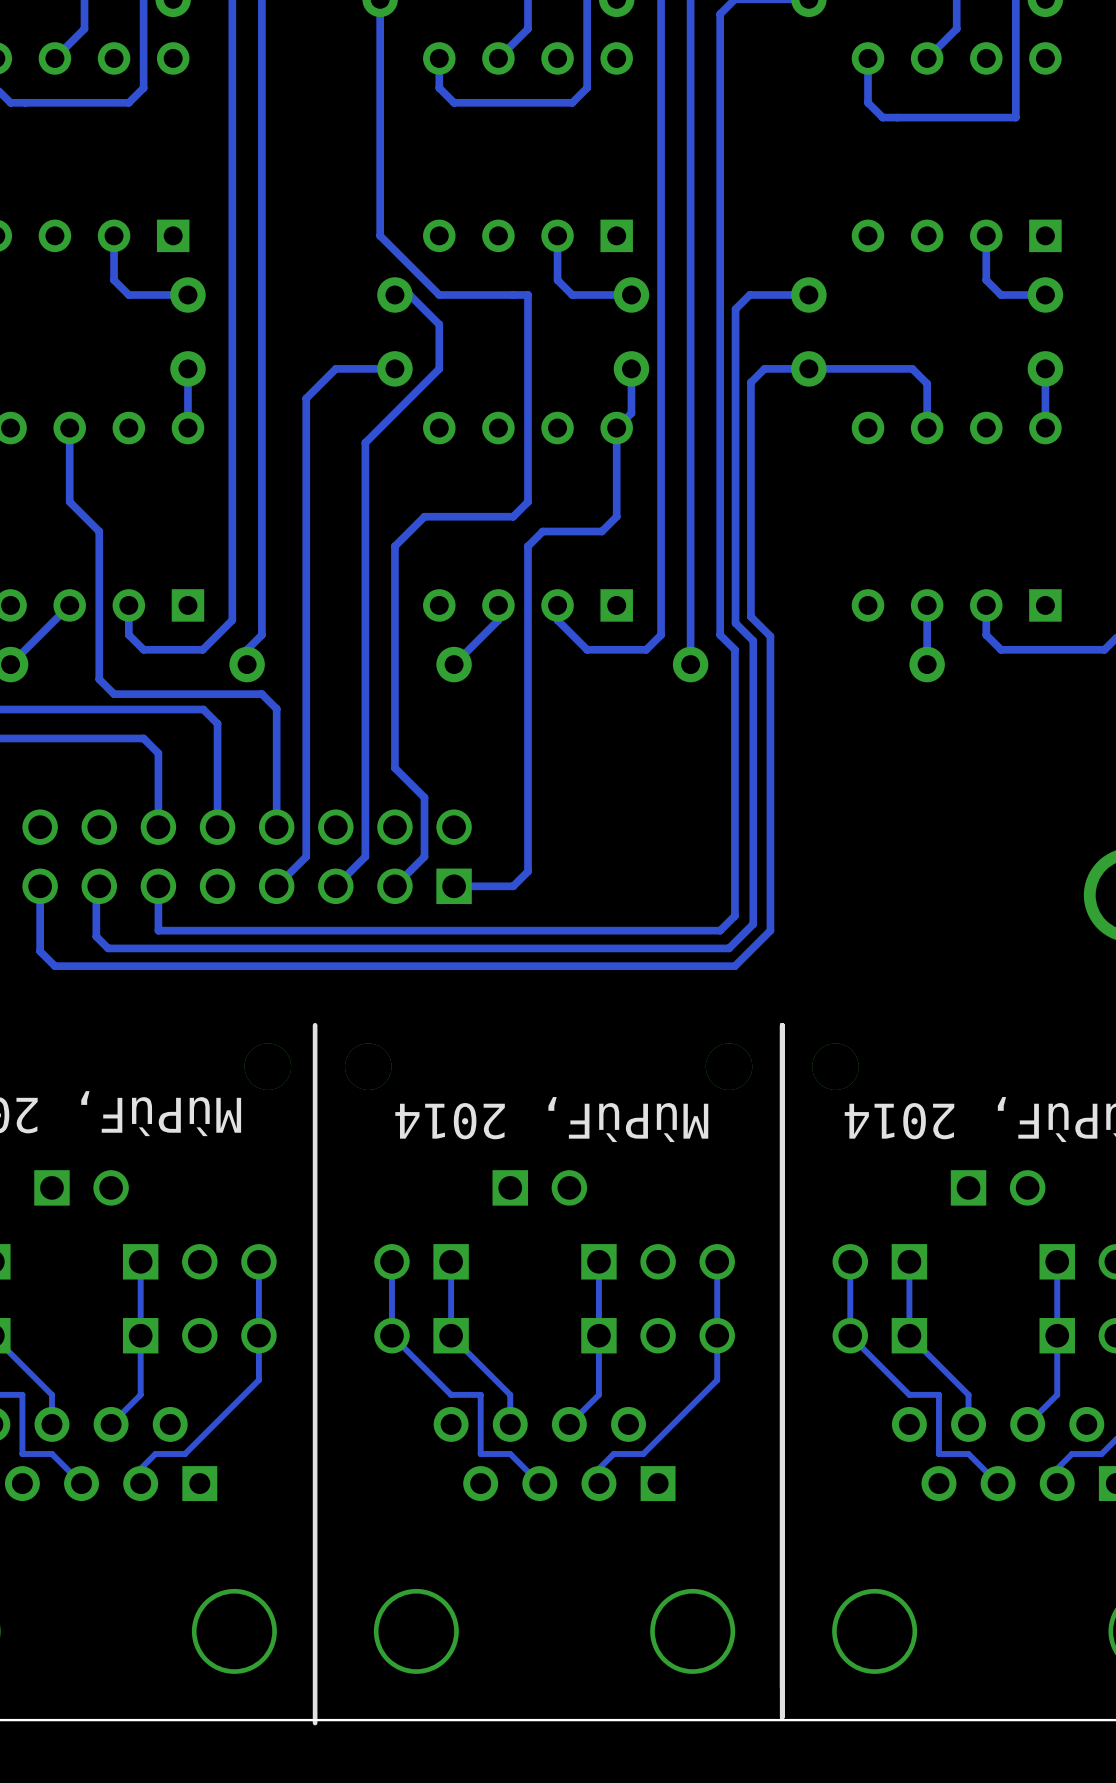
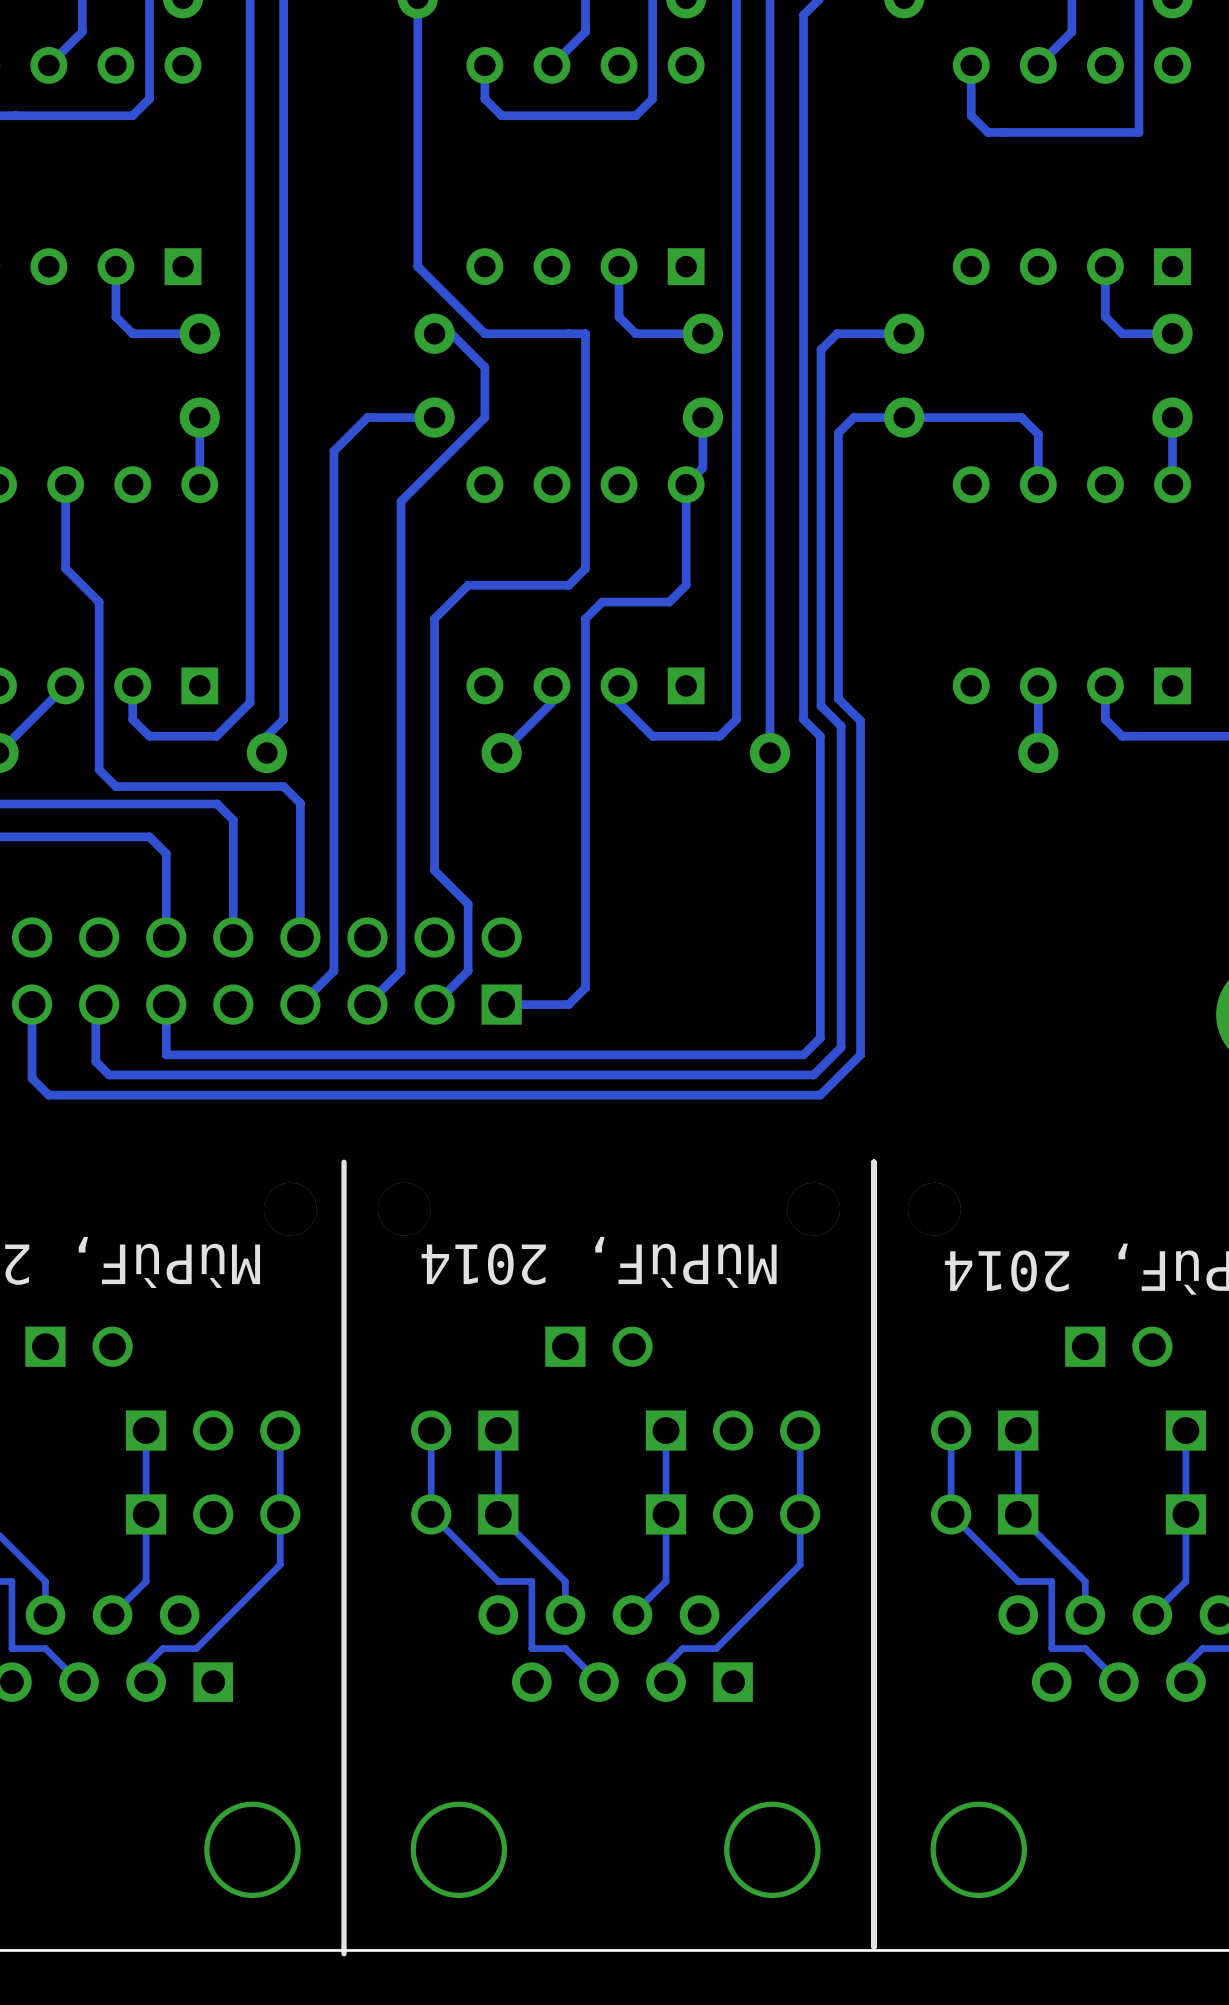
text position: MùPùF, 2014 (551, 1119) -> MùPùF, 2014 (599, 1262)

